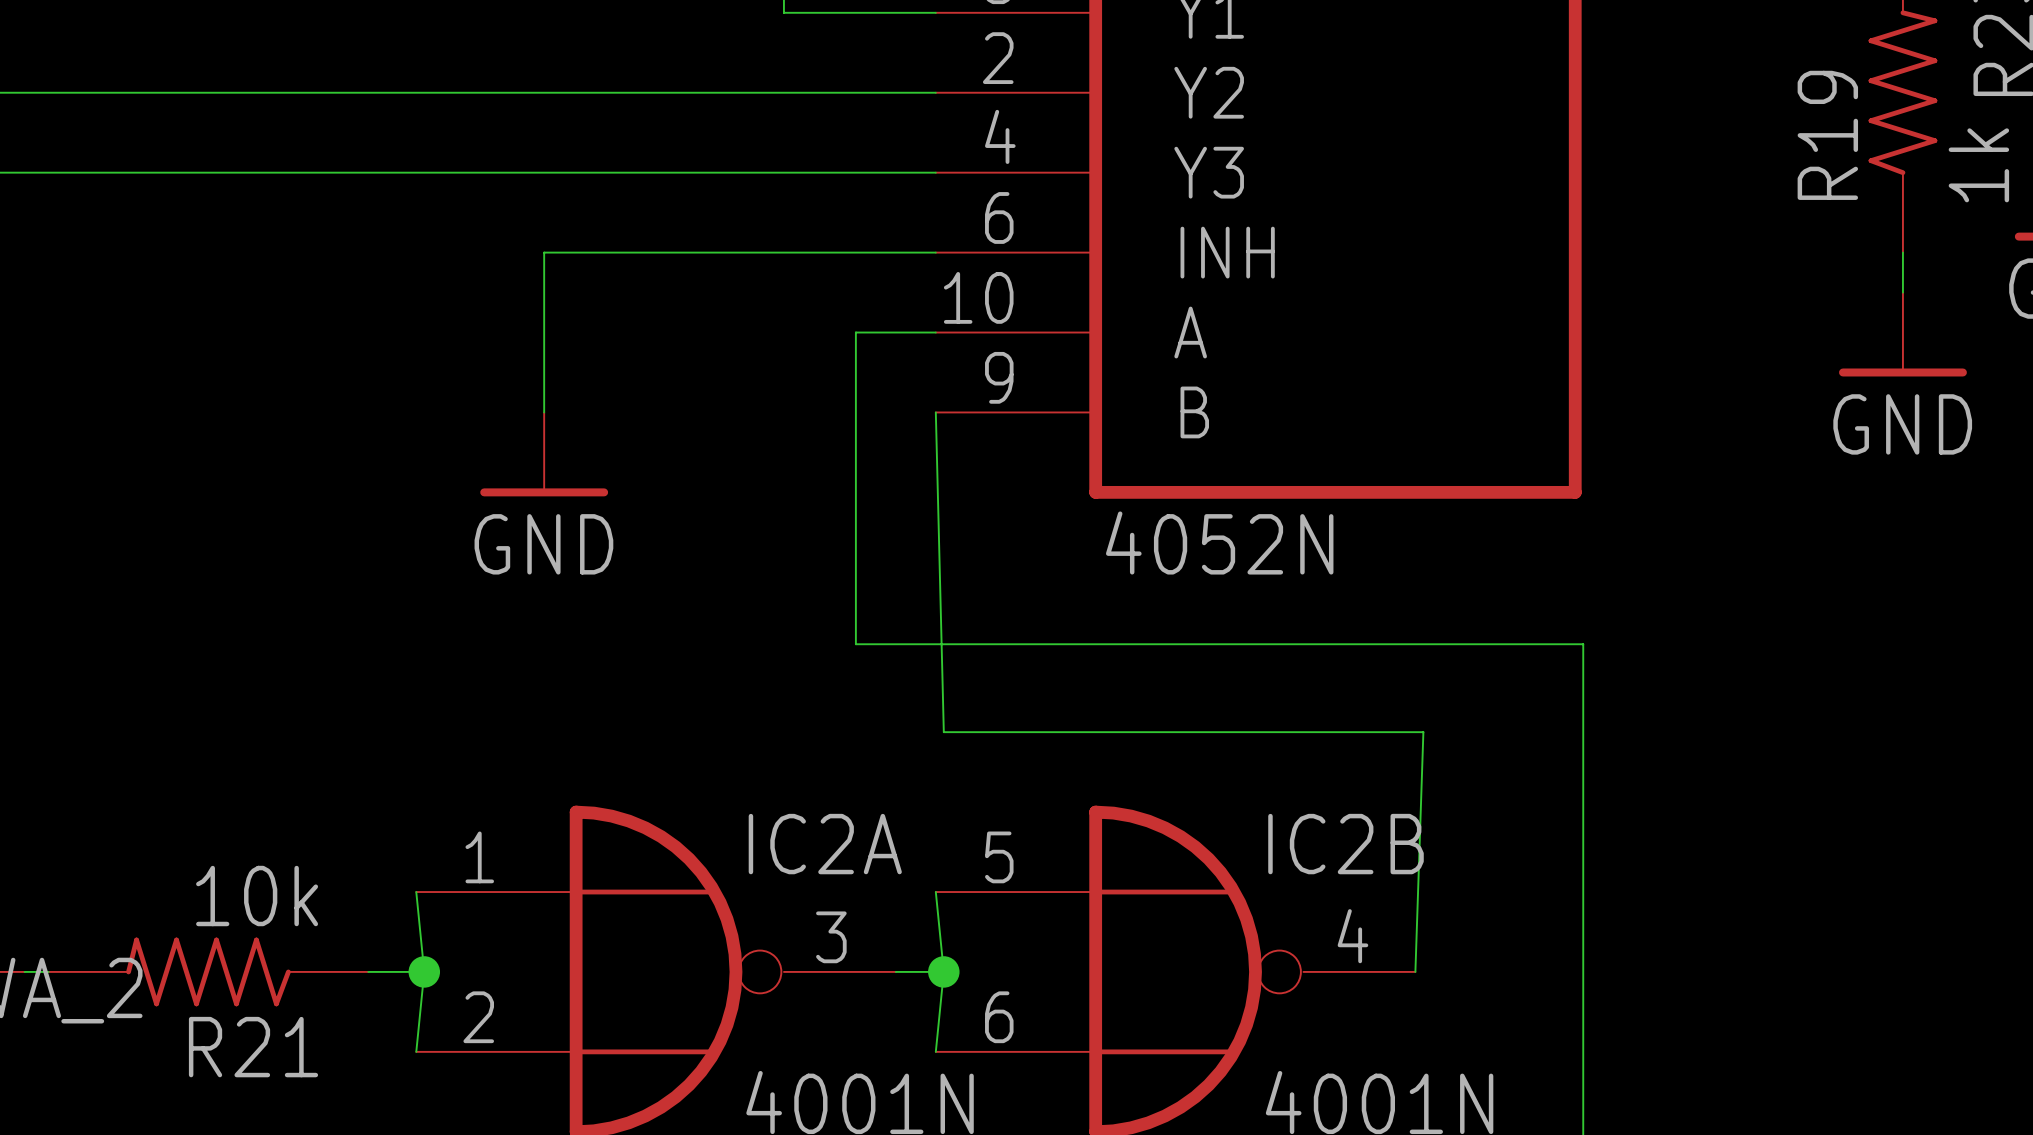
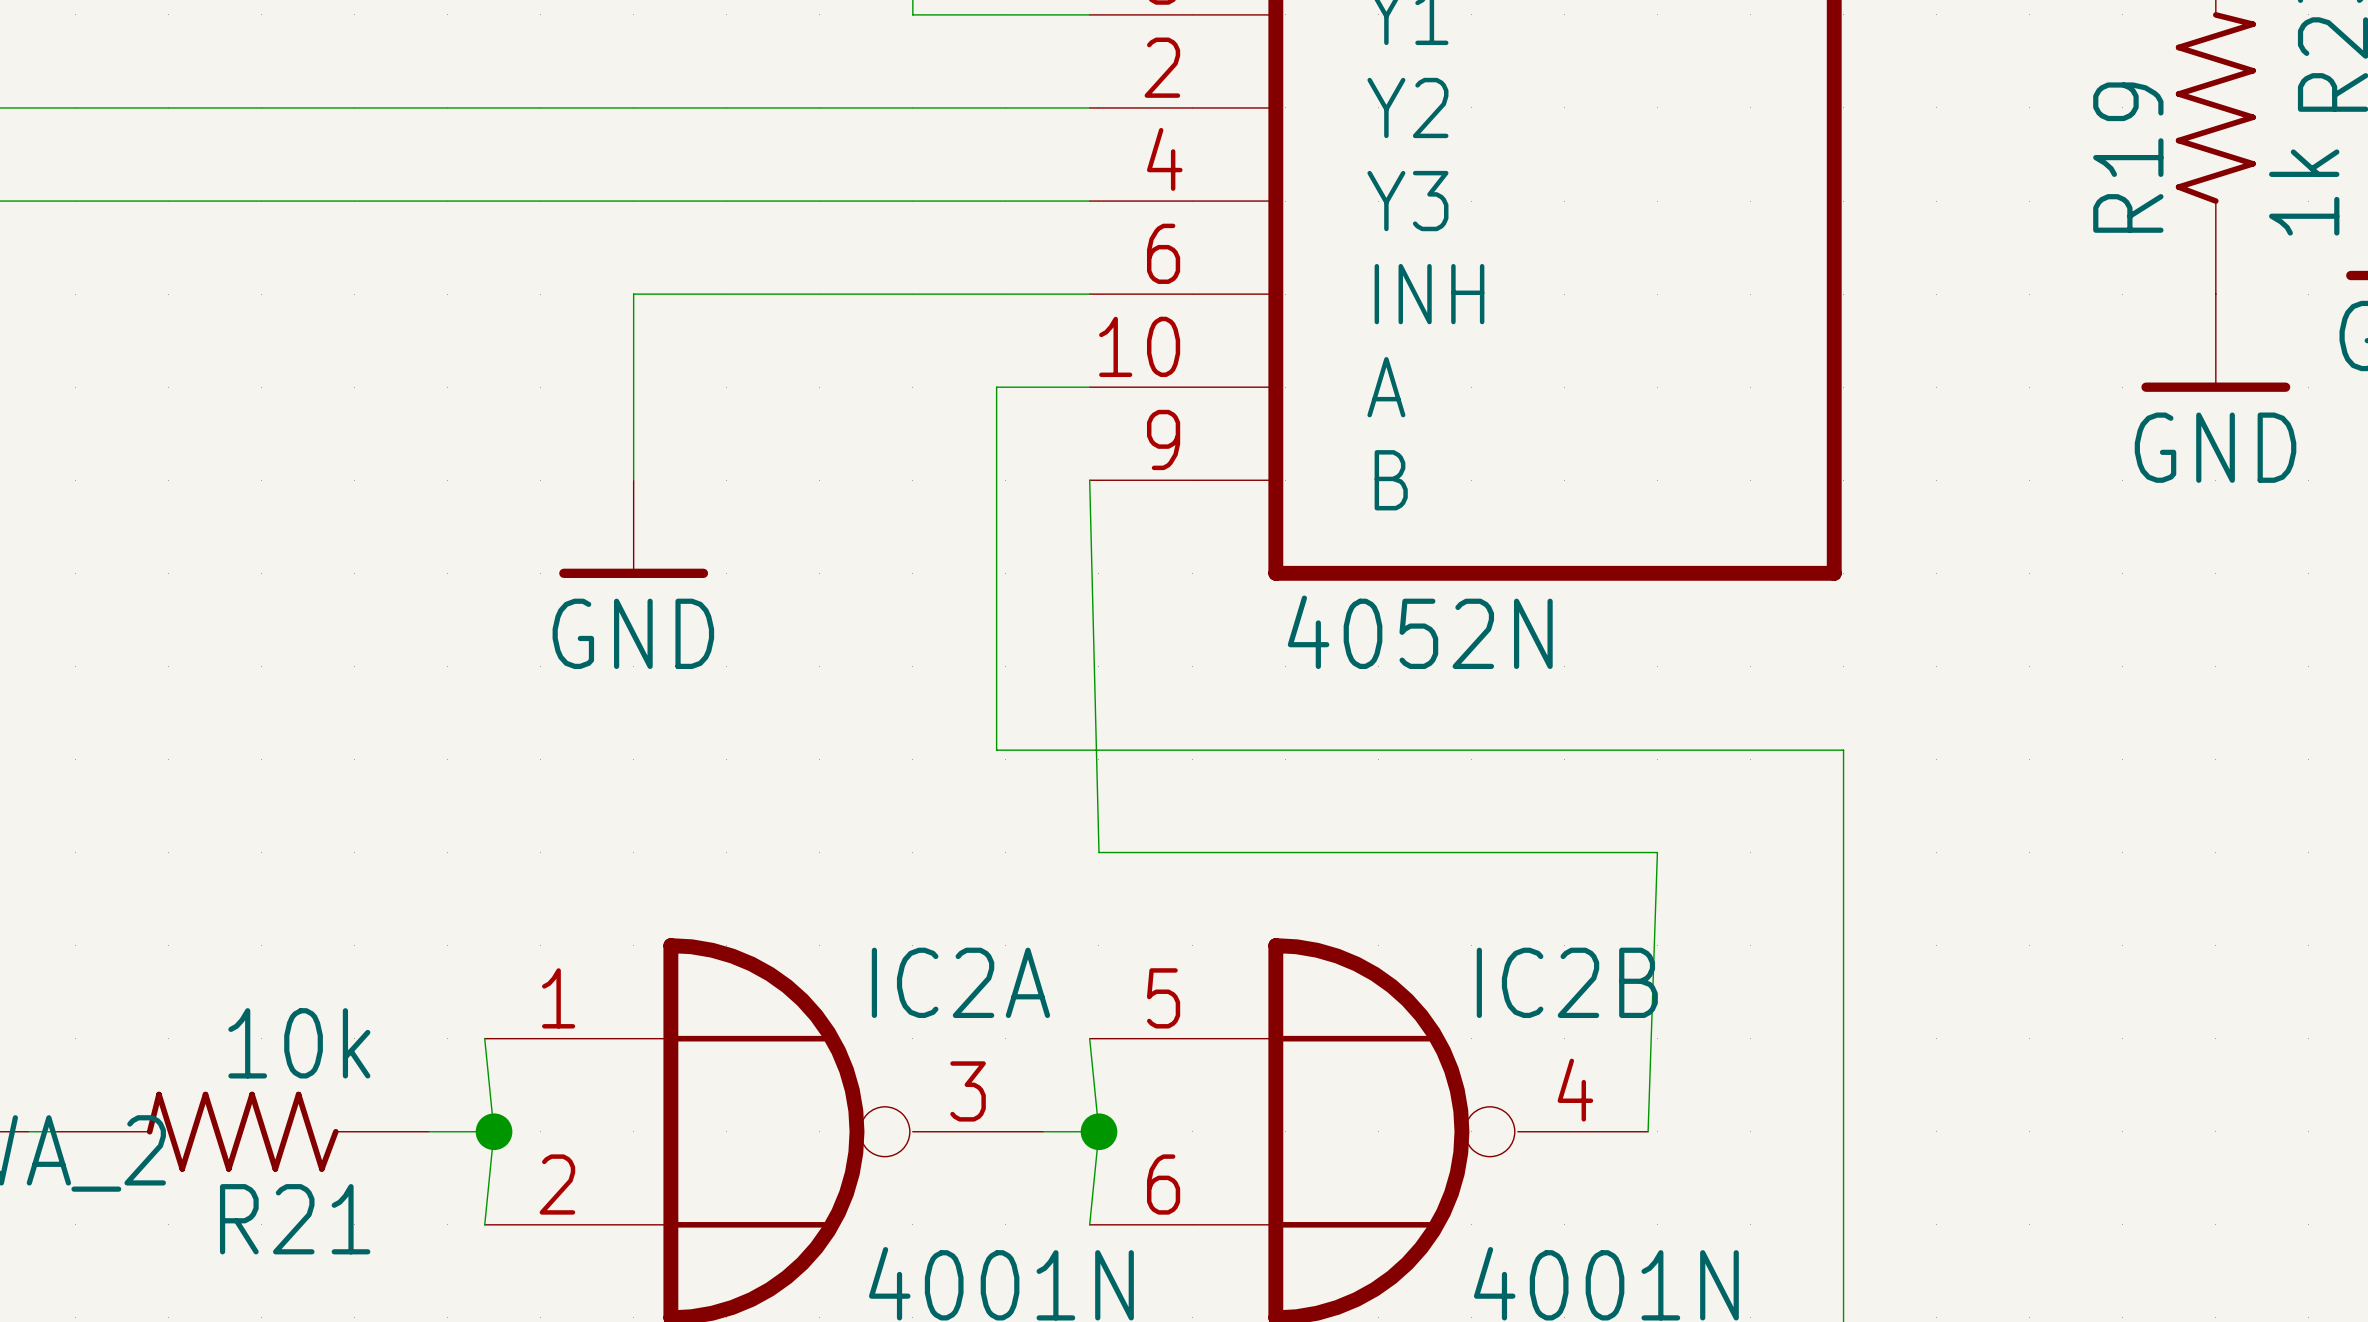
power symbol position: GND (1902, 334) -> GND (2215, 342)

